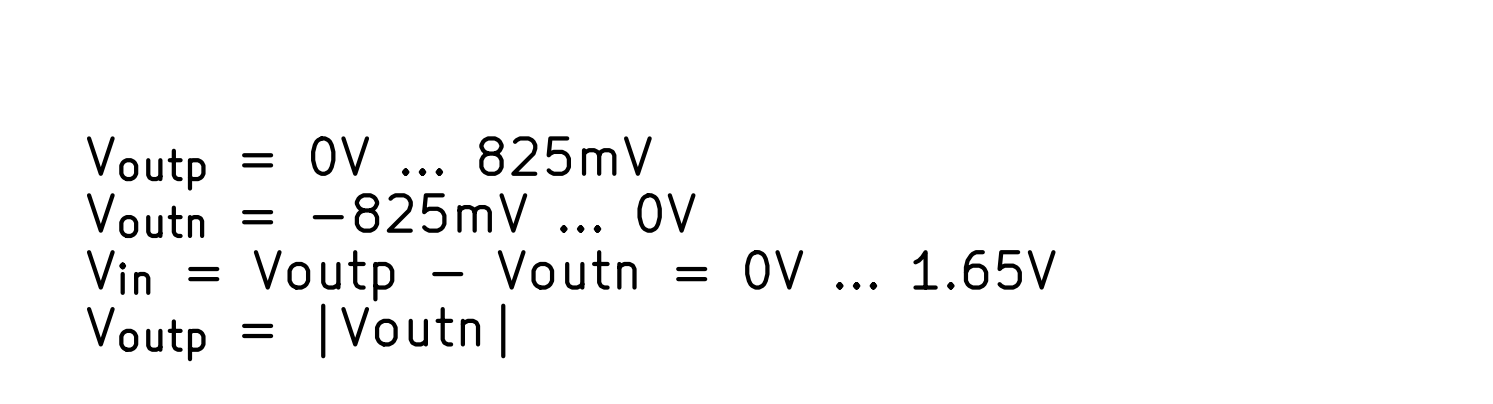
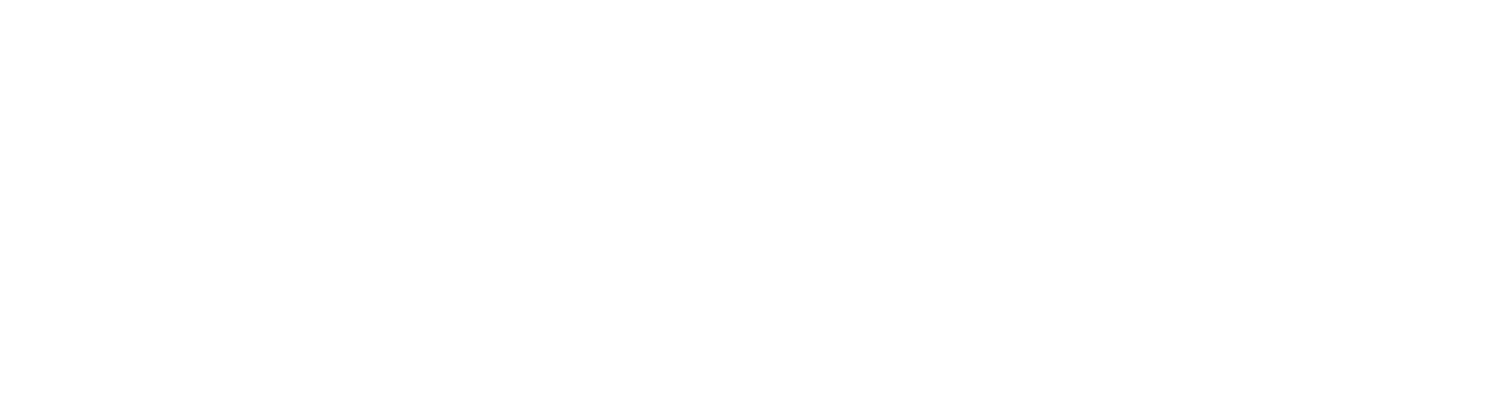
text: Voutp = 0V ... 825mV (369, 163) -> none
text: Voutn = -825mV ... 0V (391, 215) -> none
text: Vin = Voutp - Voutn = 0V ... 1.65V (571, 275) -> none
text: Voutp = |Voutn| (296, 332) -> none

